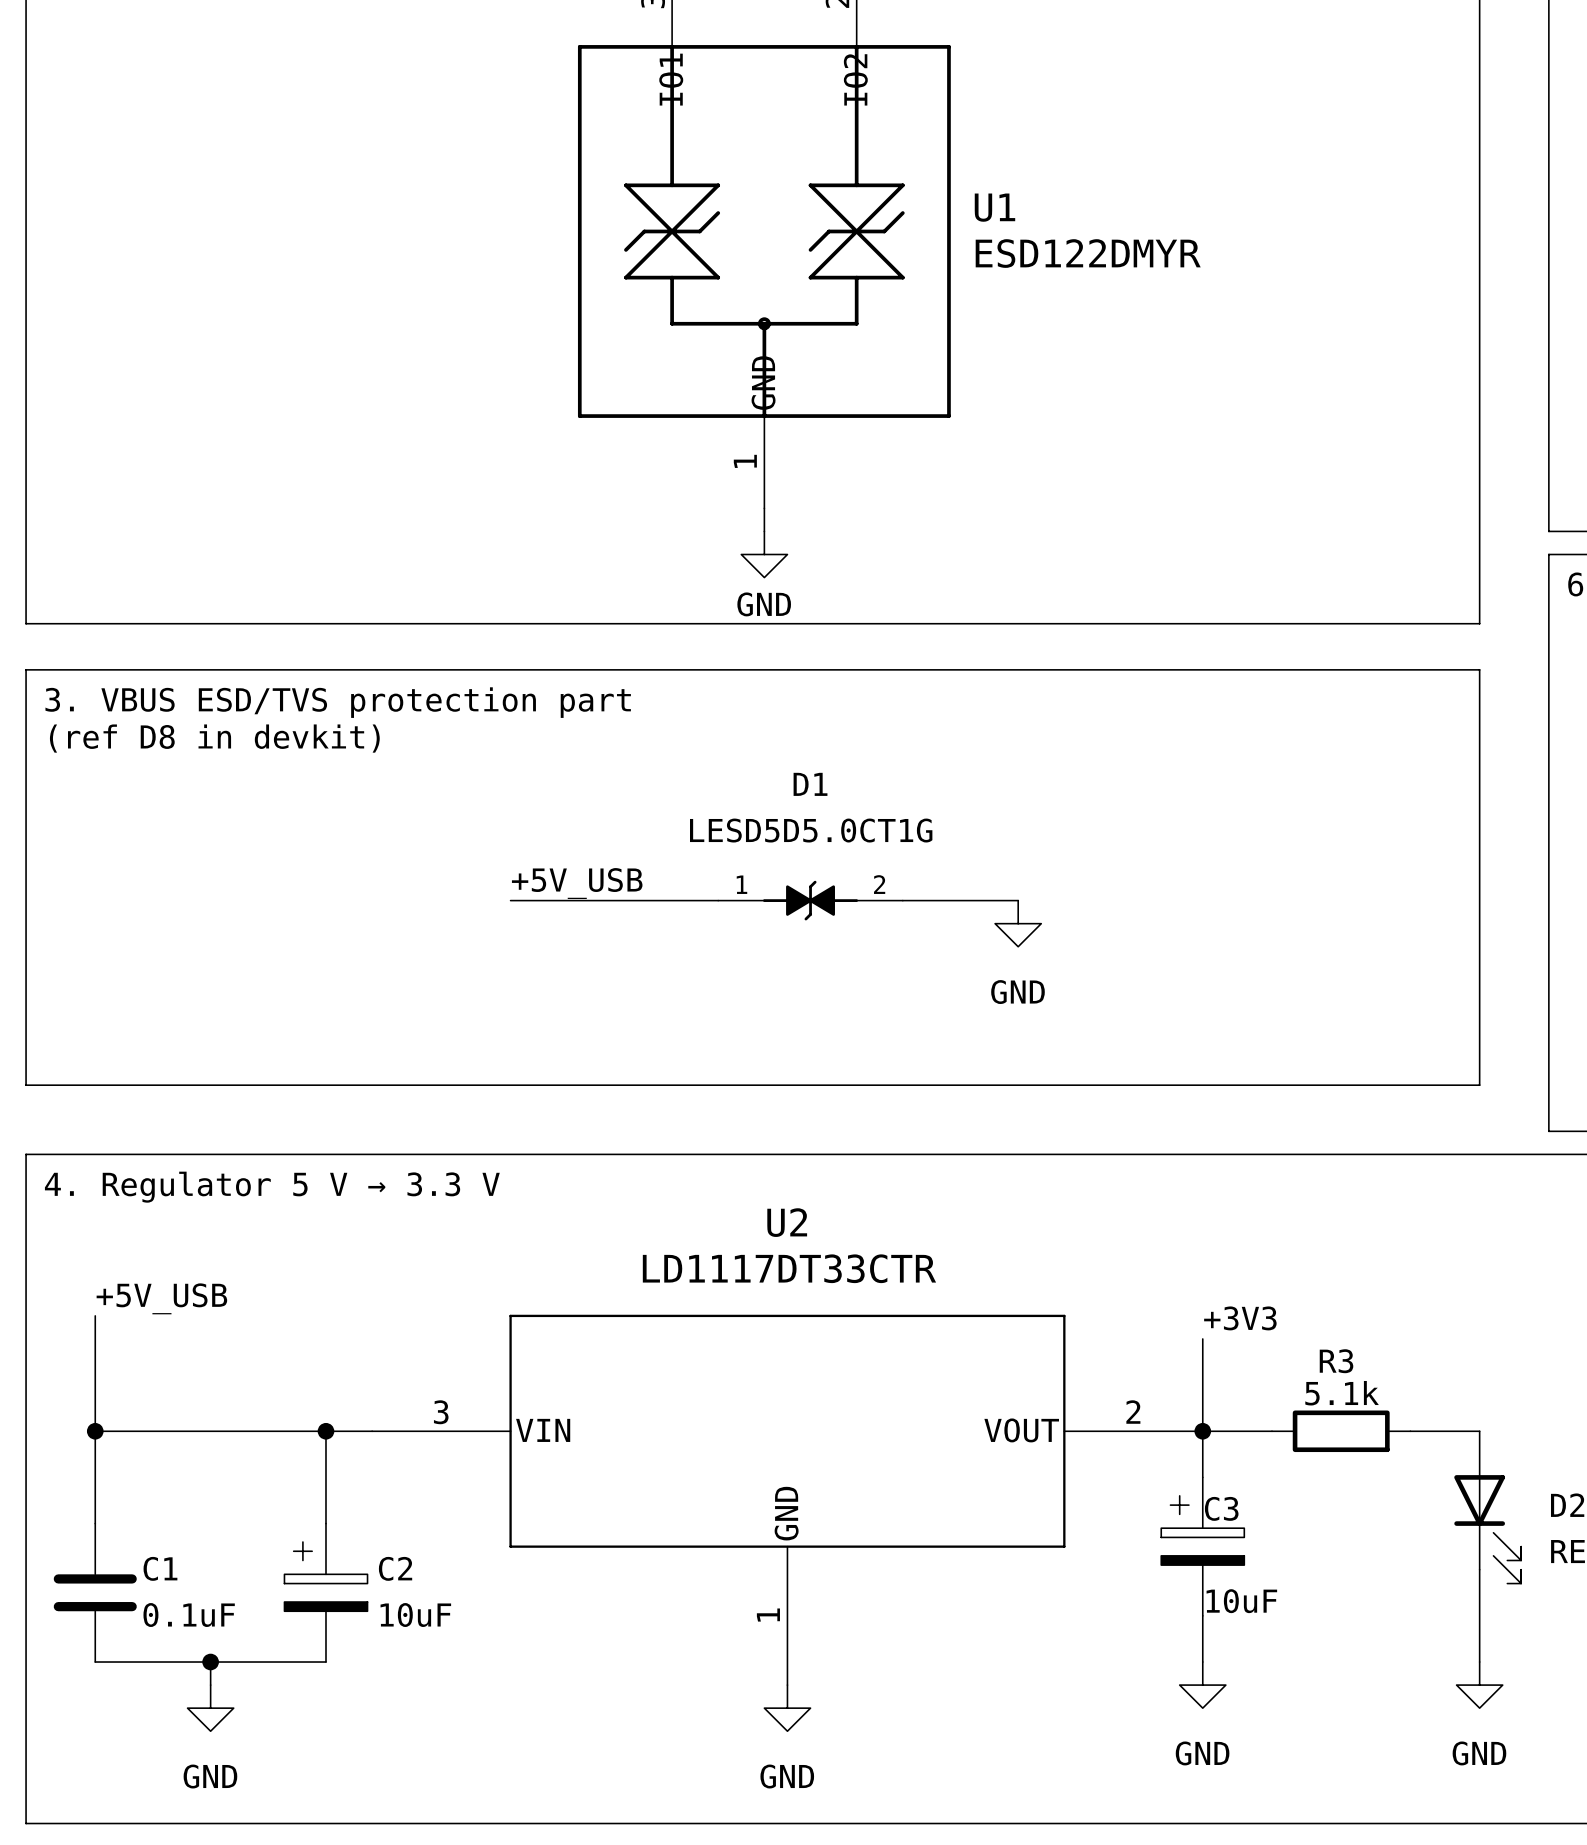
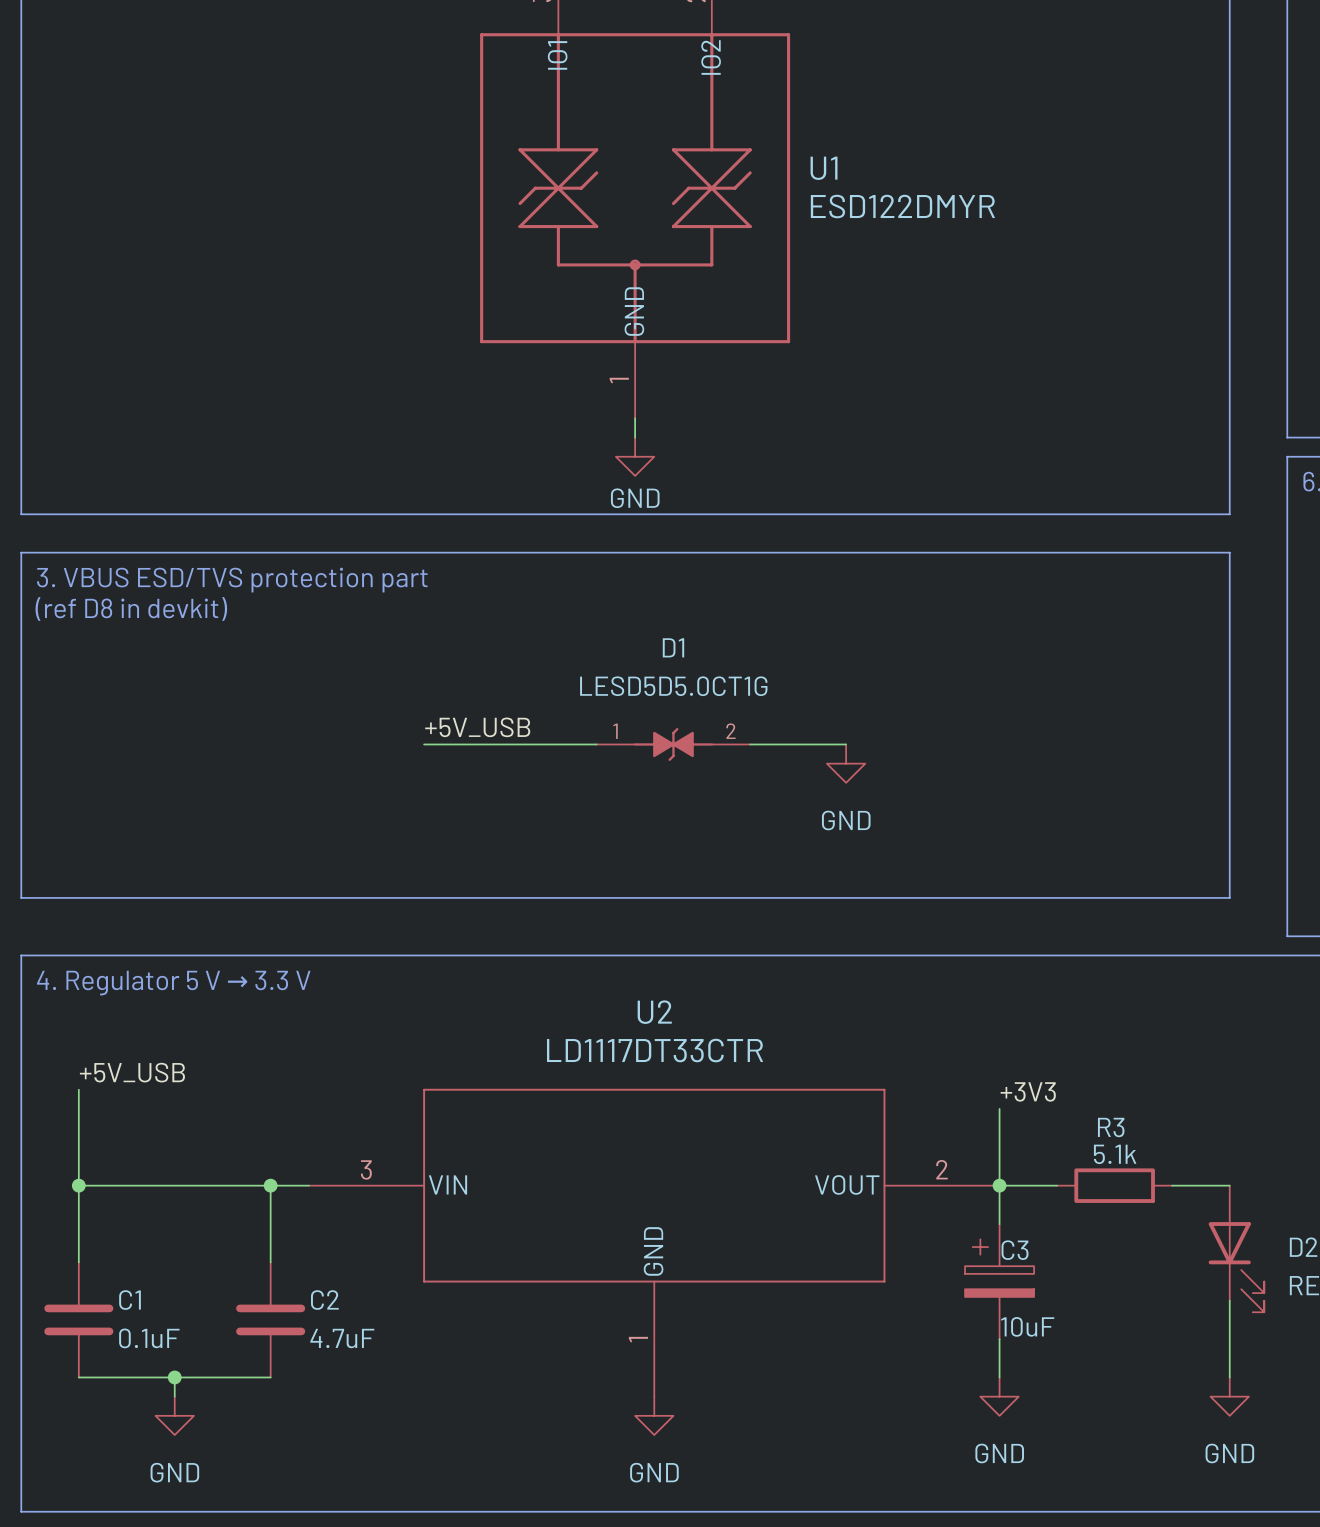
C2 symbol: [284, 1523, 368, 1663] -> [236, 1262, 306, 1378]
C2 value: 10uF (415, 1615) -> 4.7uF (342, 1338)

